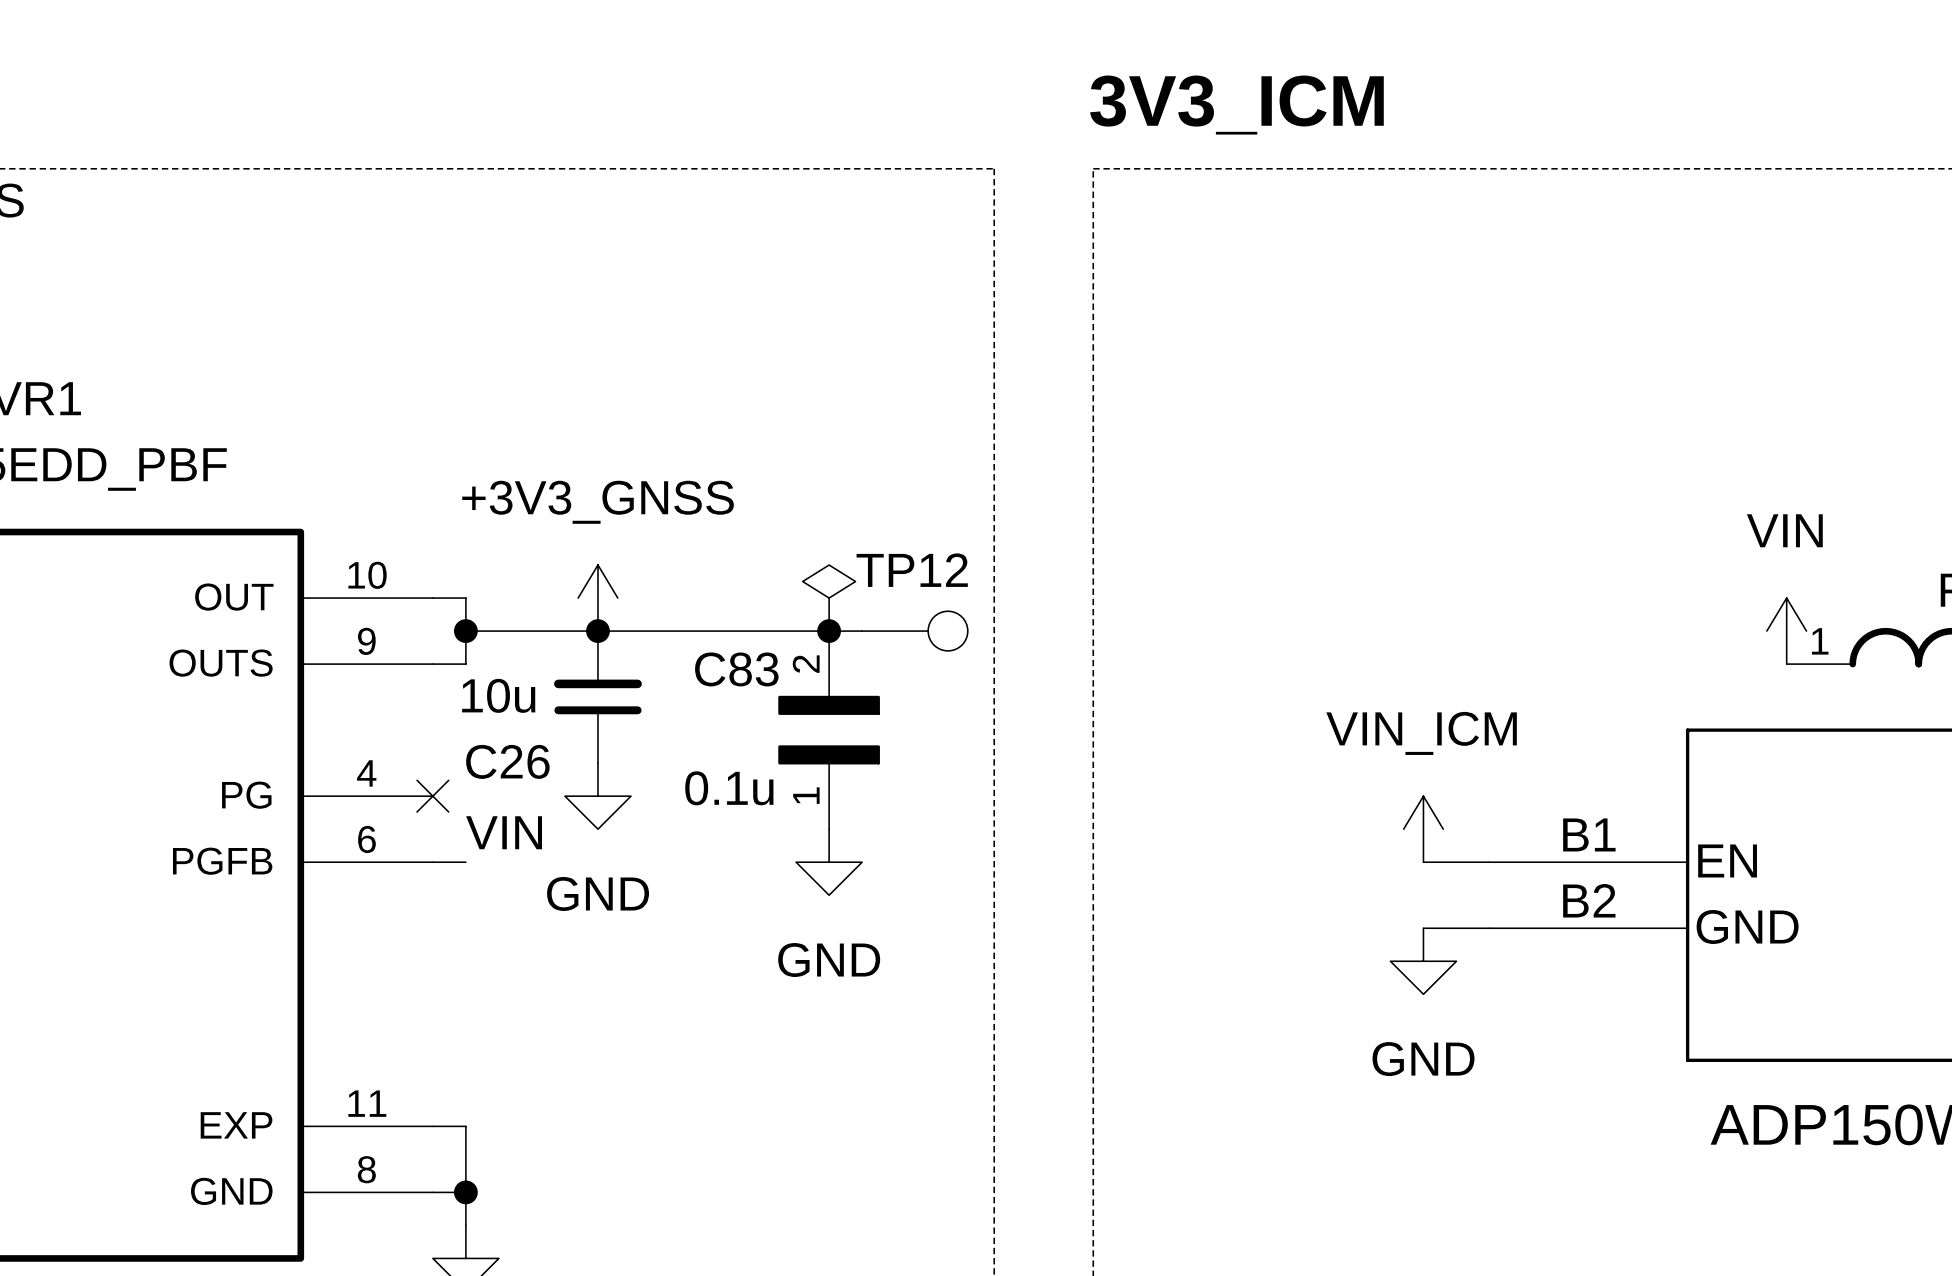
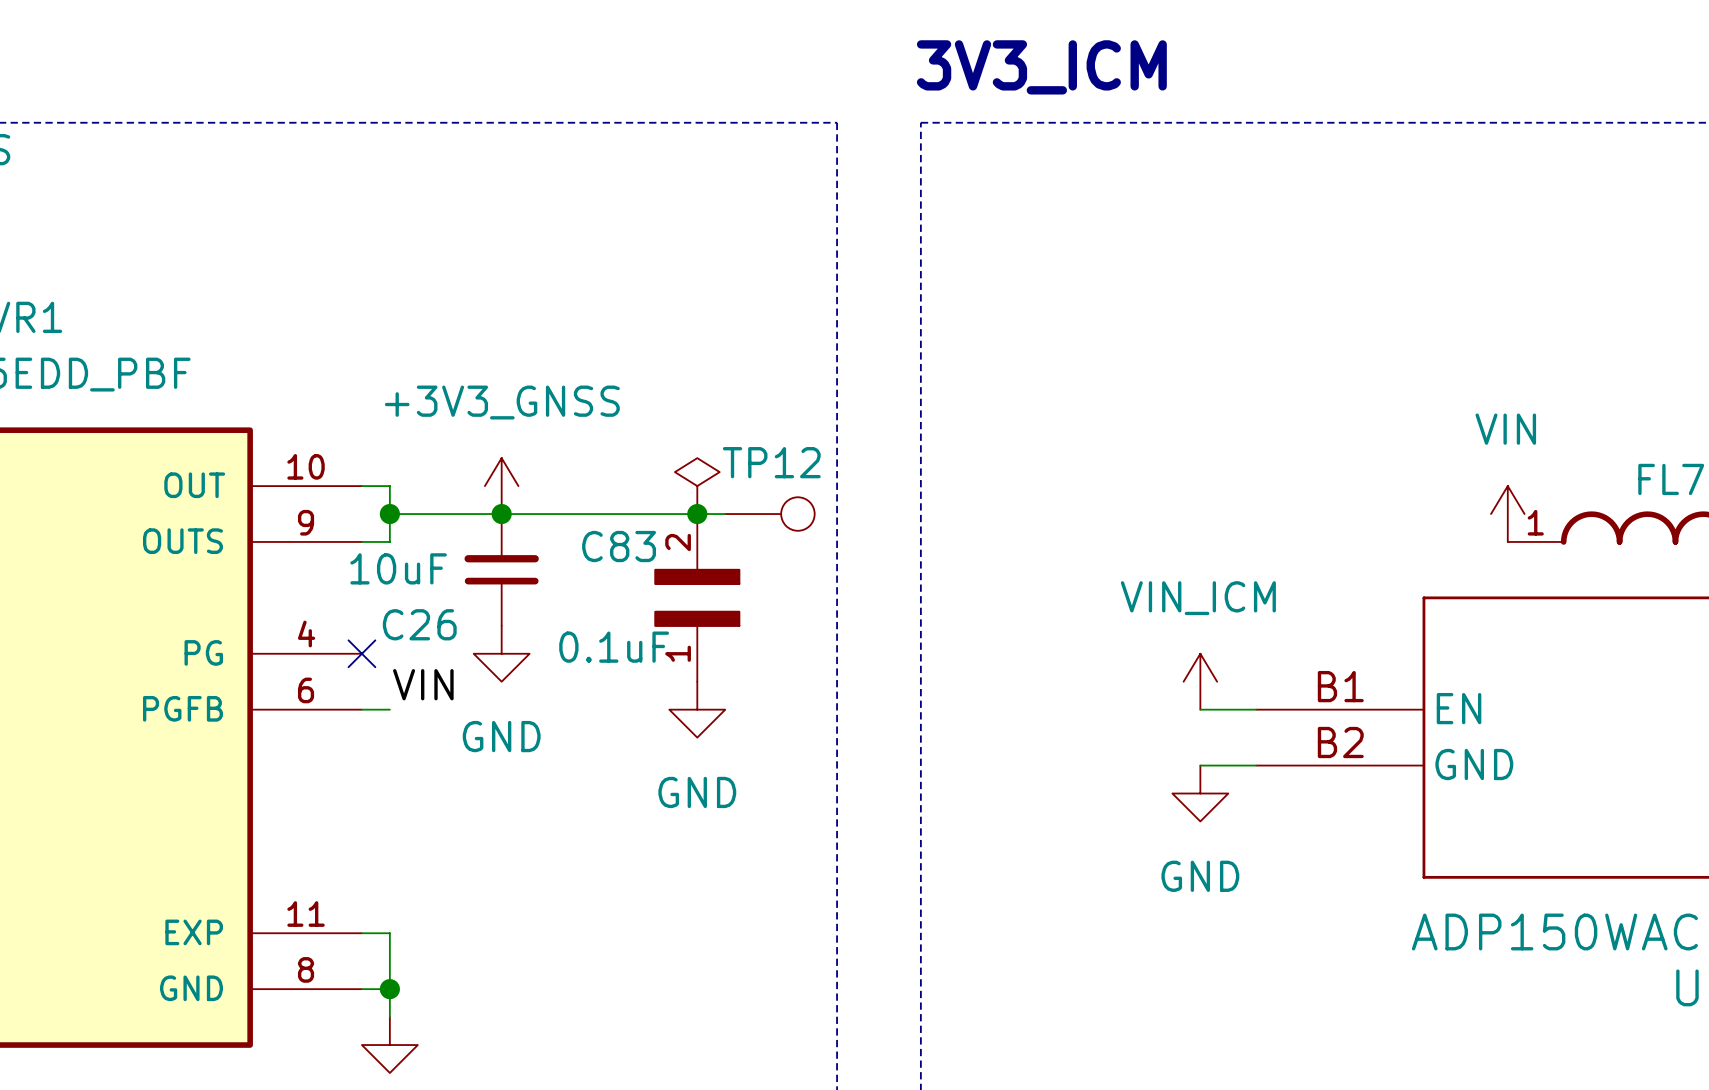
C26 value: 10u (498, 695) -> 10uF (398, 568)
C83 value: 0.1u (729, 788) -> 0.1uF (614, 647)

